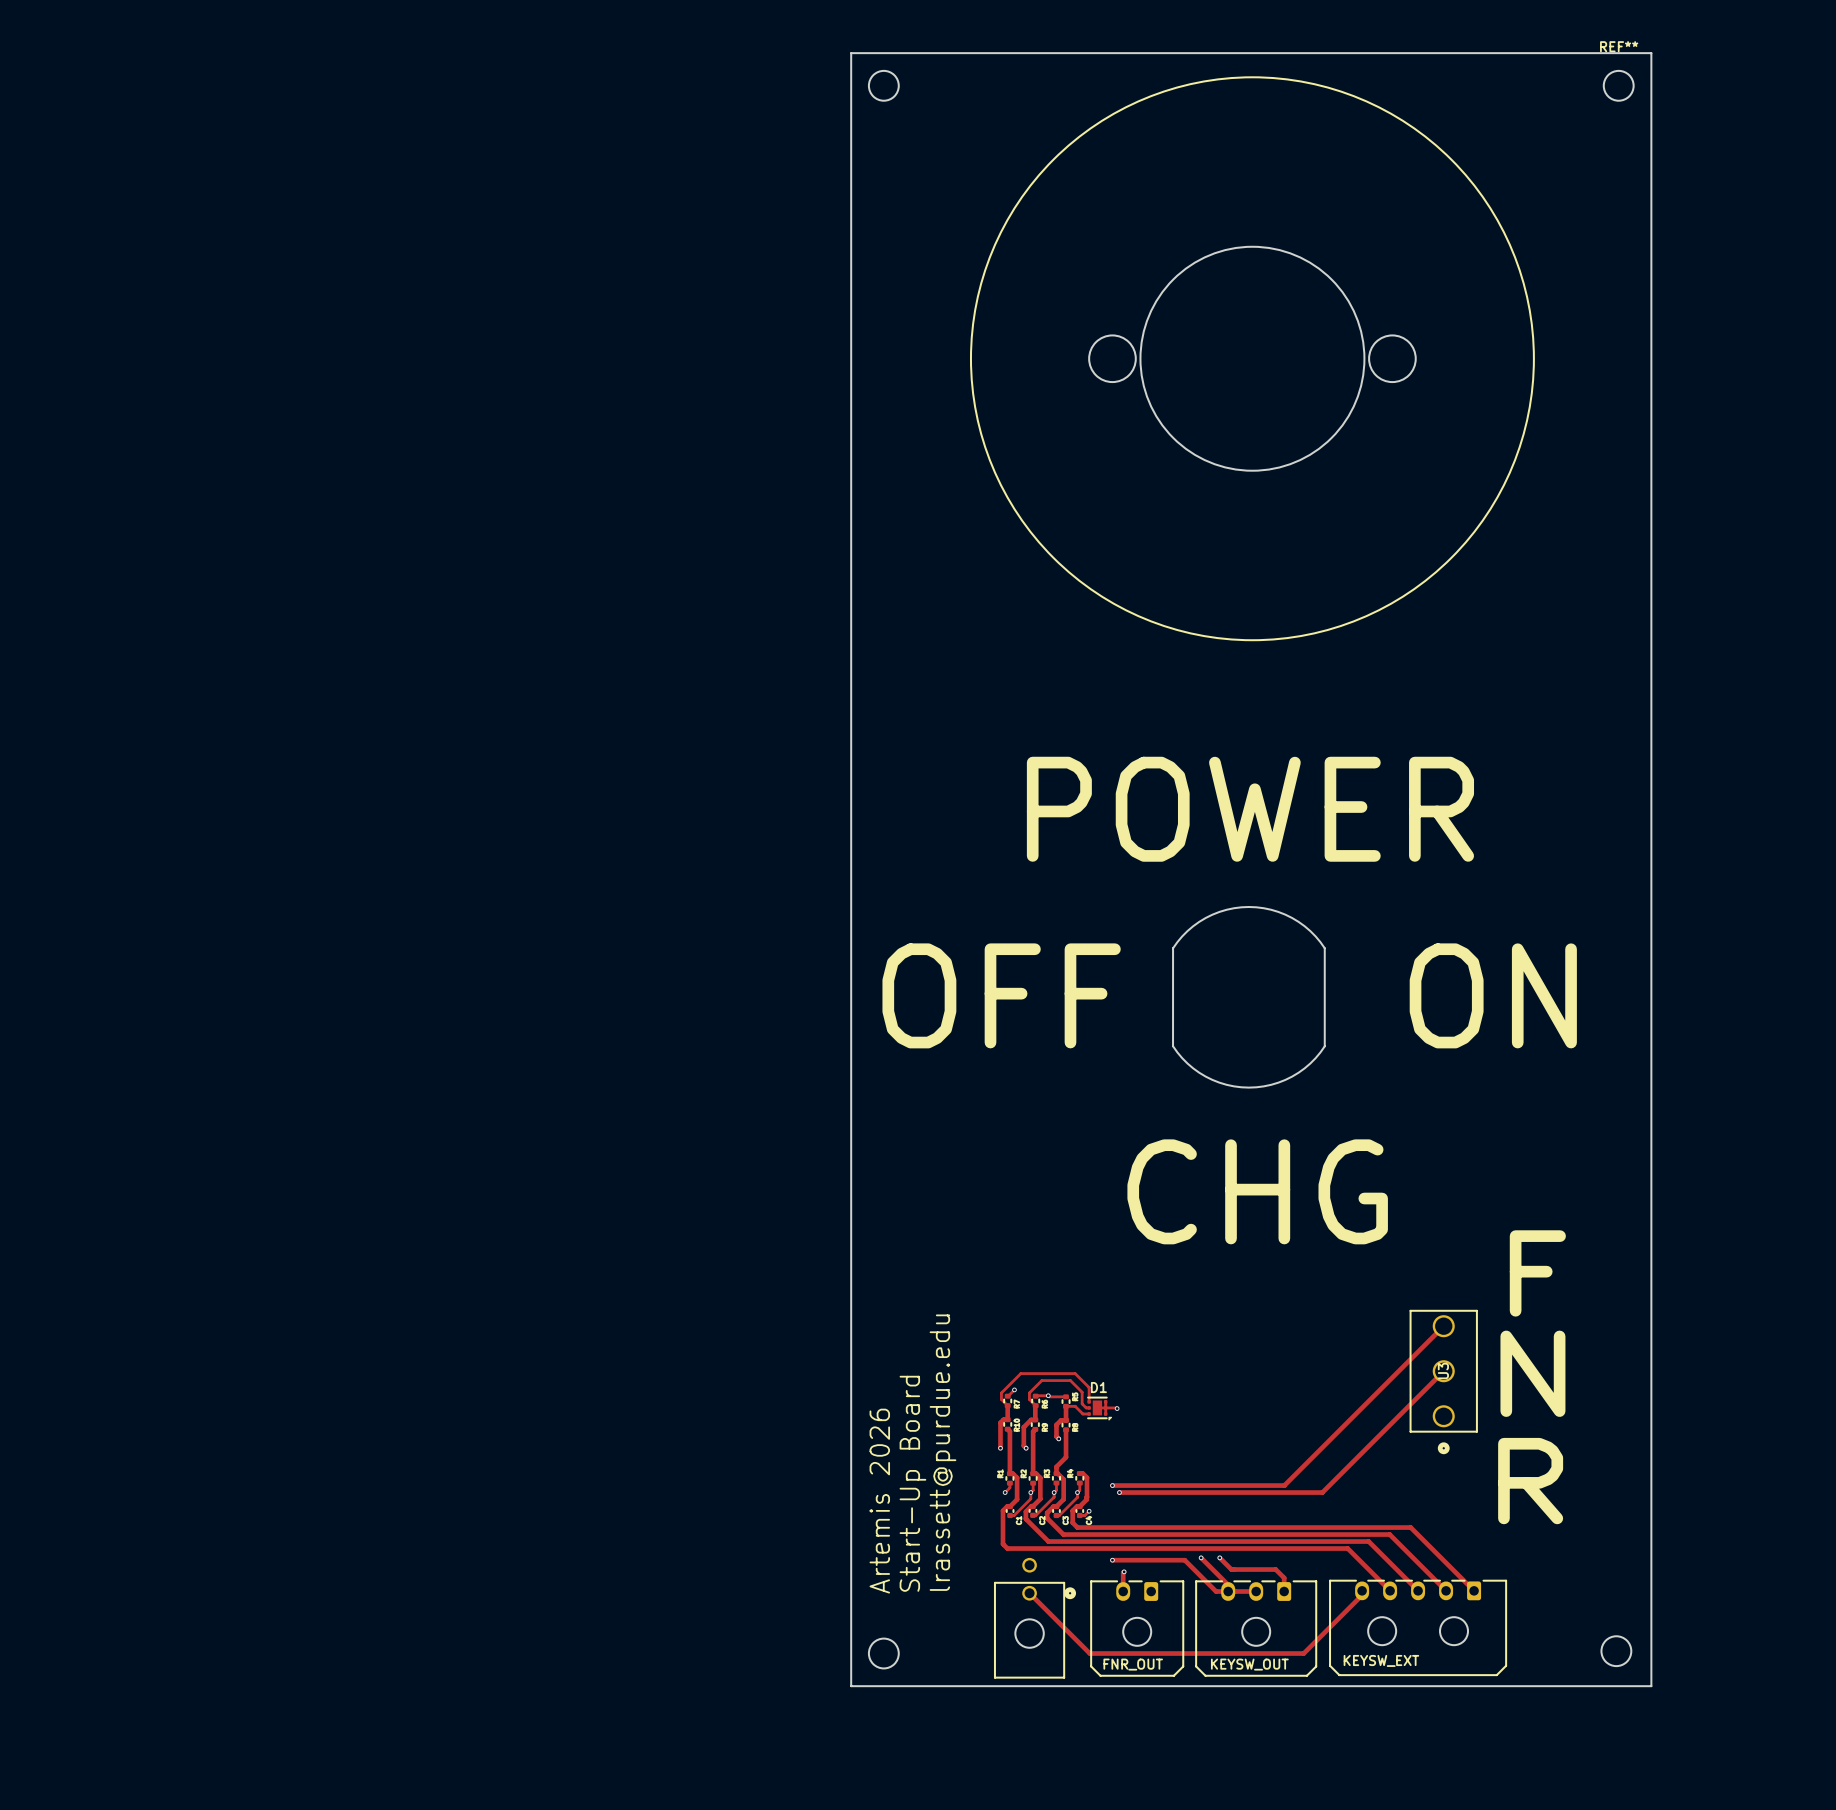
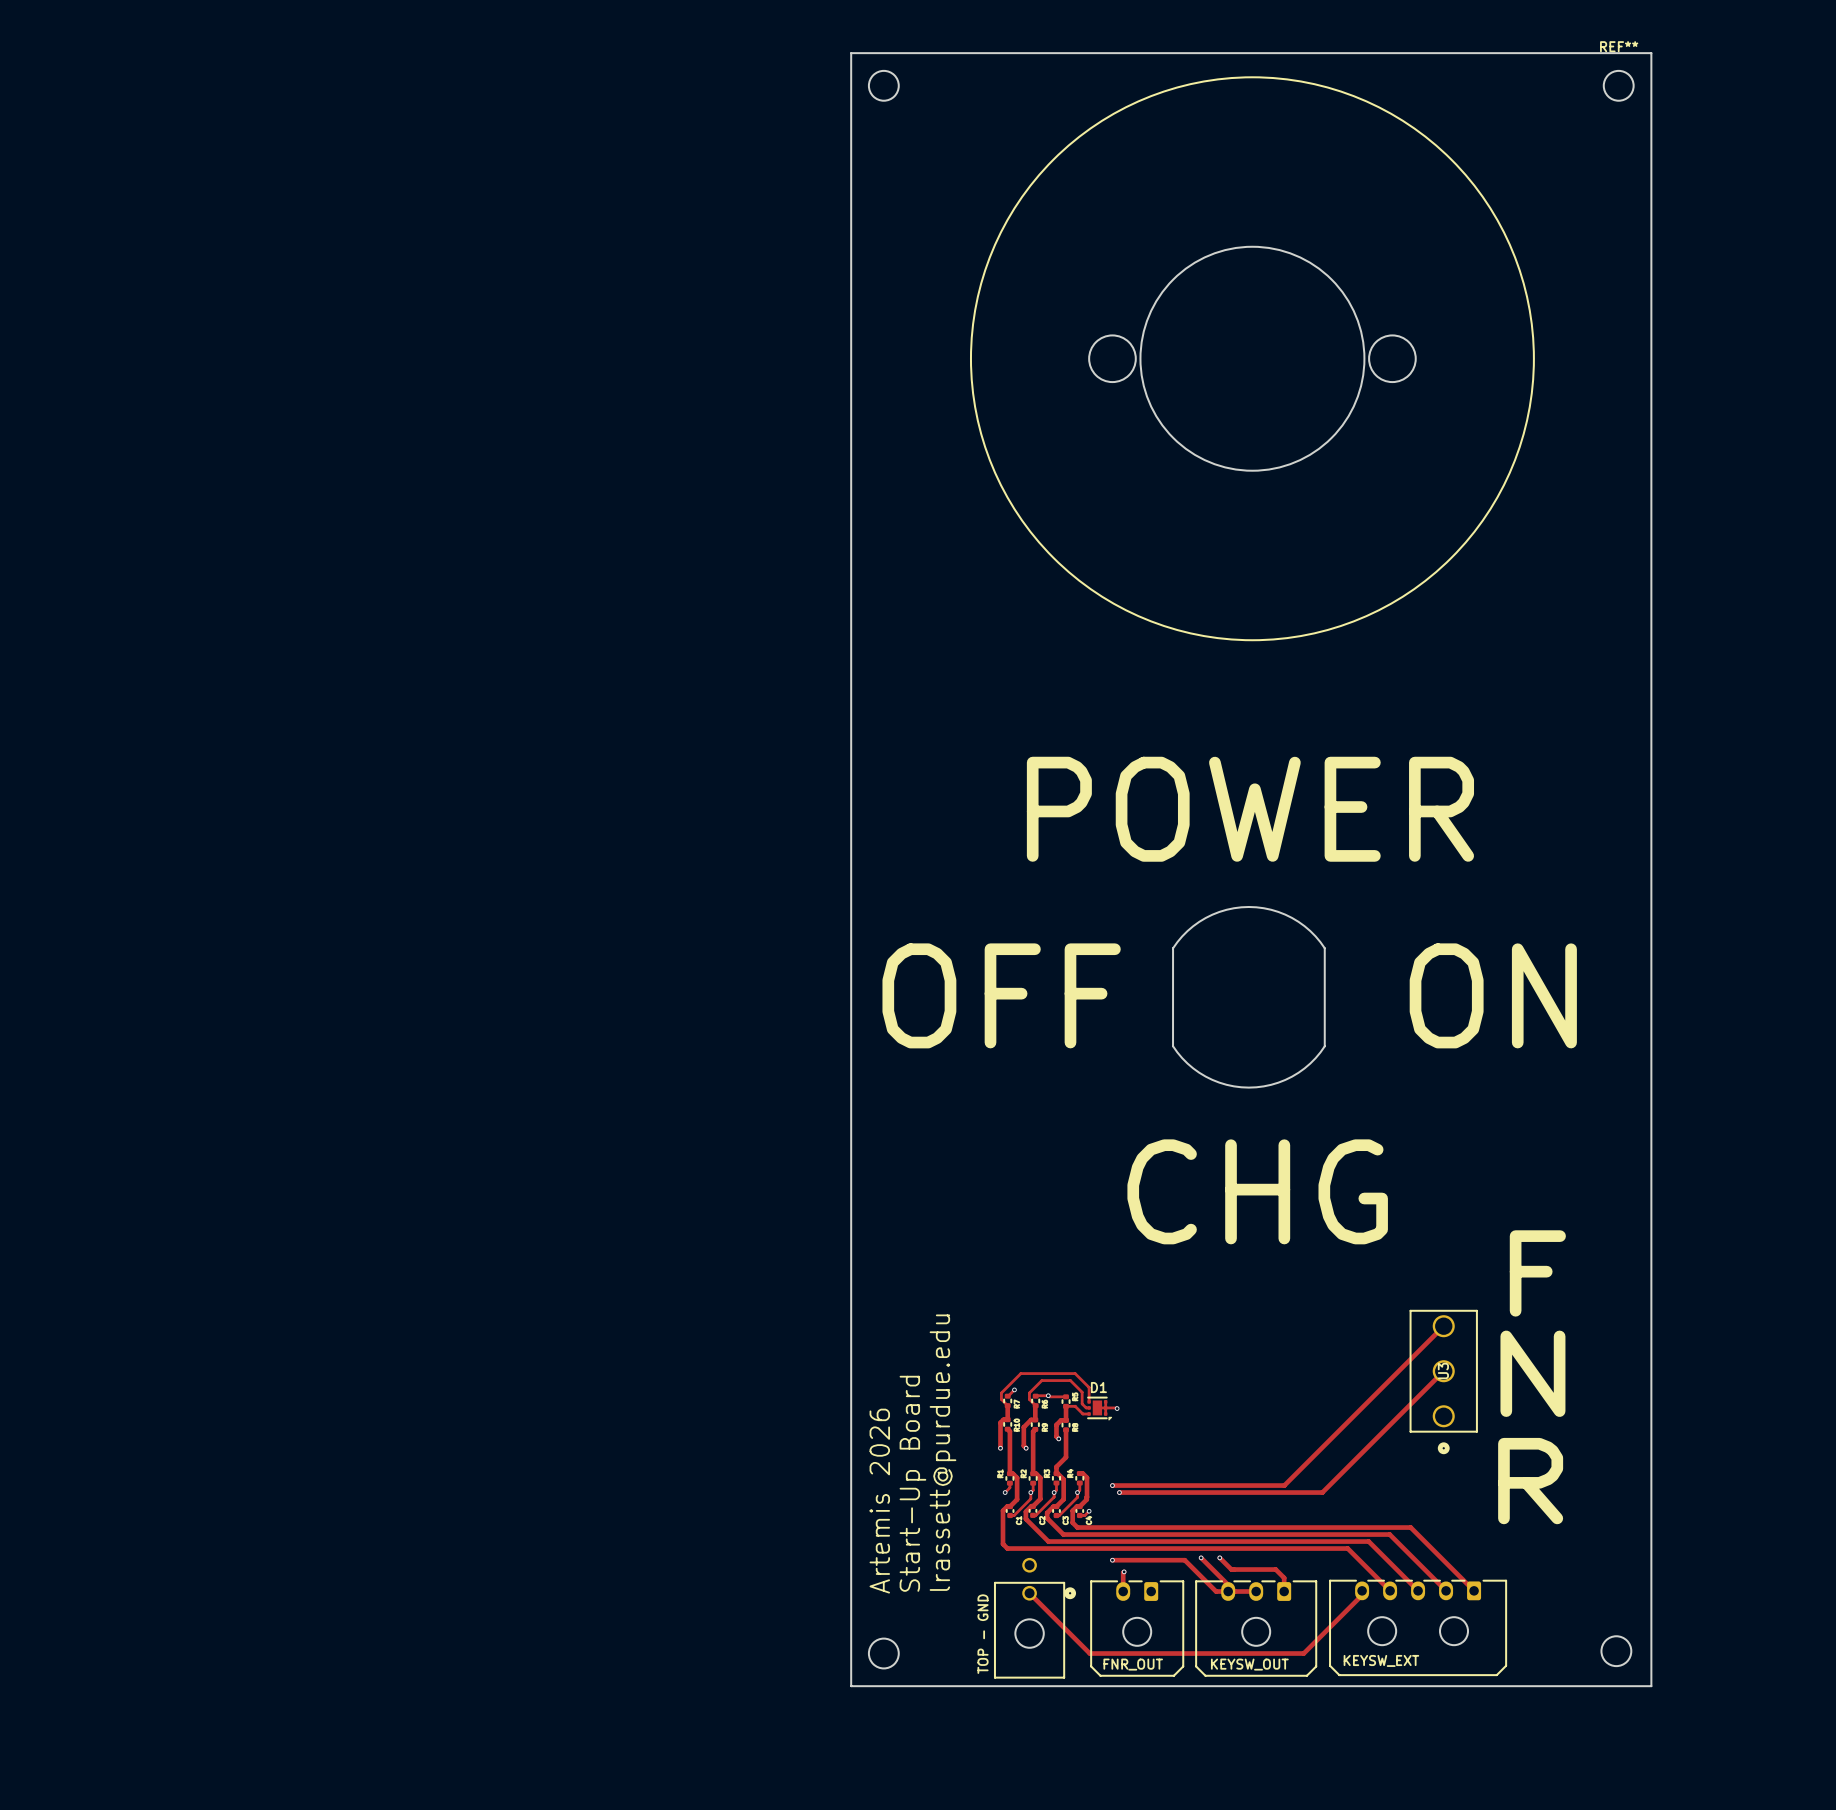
text: none -> TOP - GND (983, 1634)

